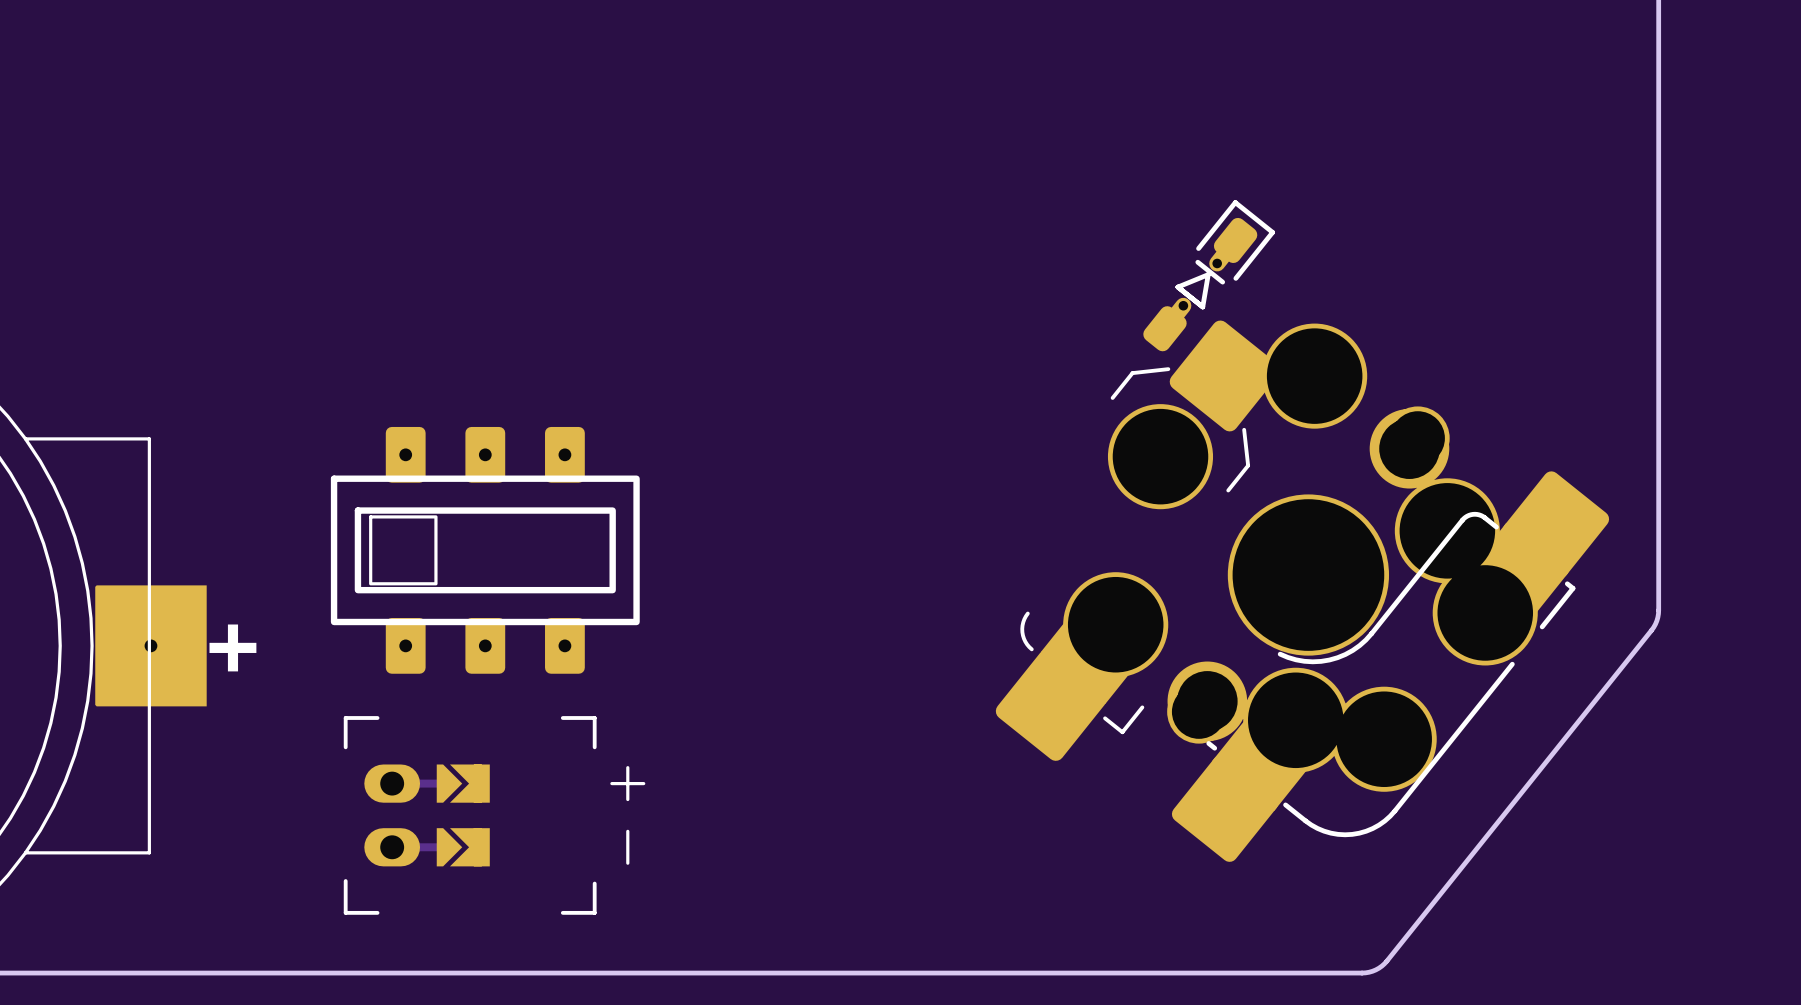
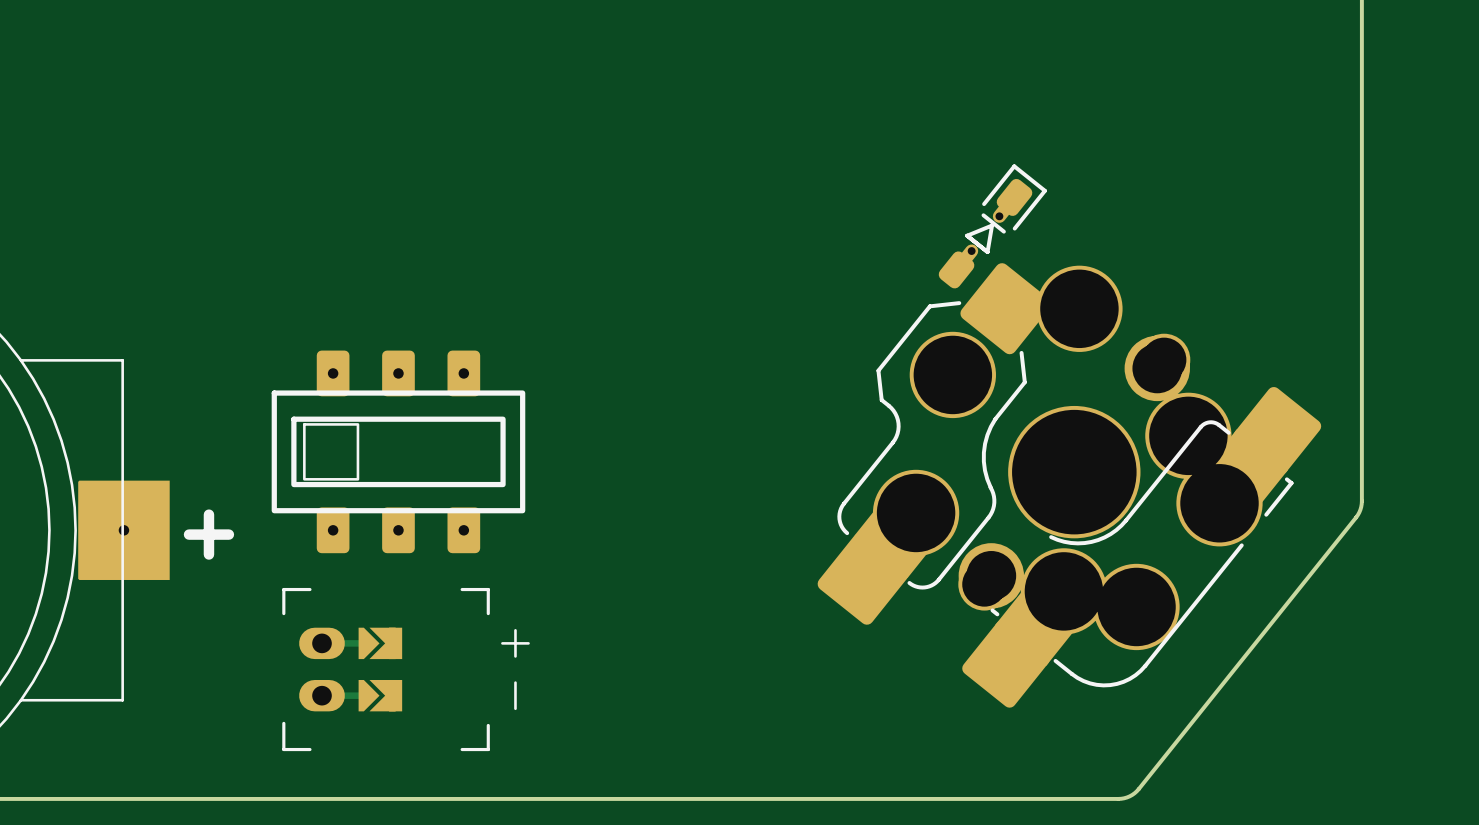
part footprint: [995, 320, 1610, 862] -> [817, 263, 1322, 708]

